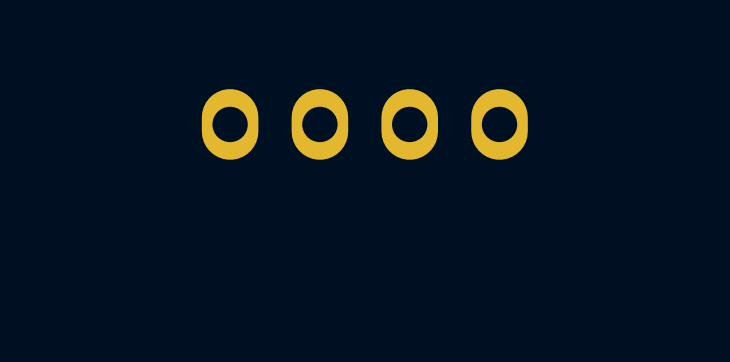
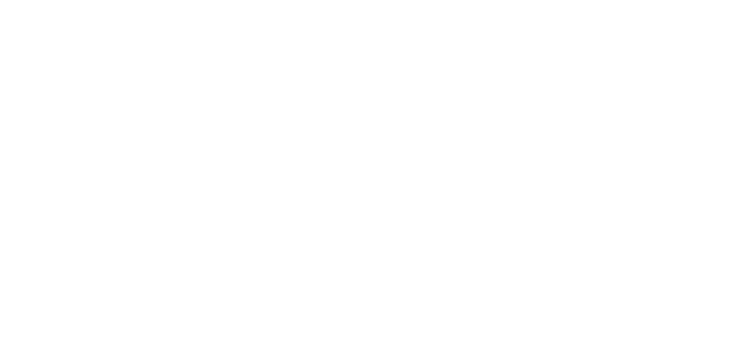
part: (364, 124) -> none

